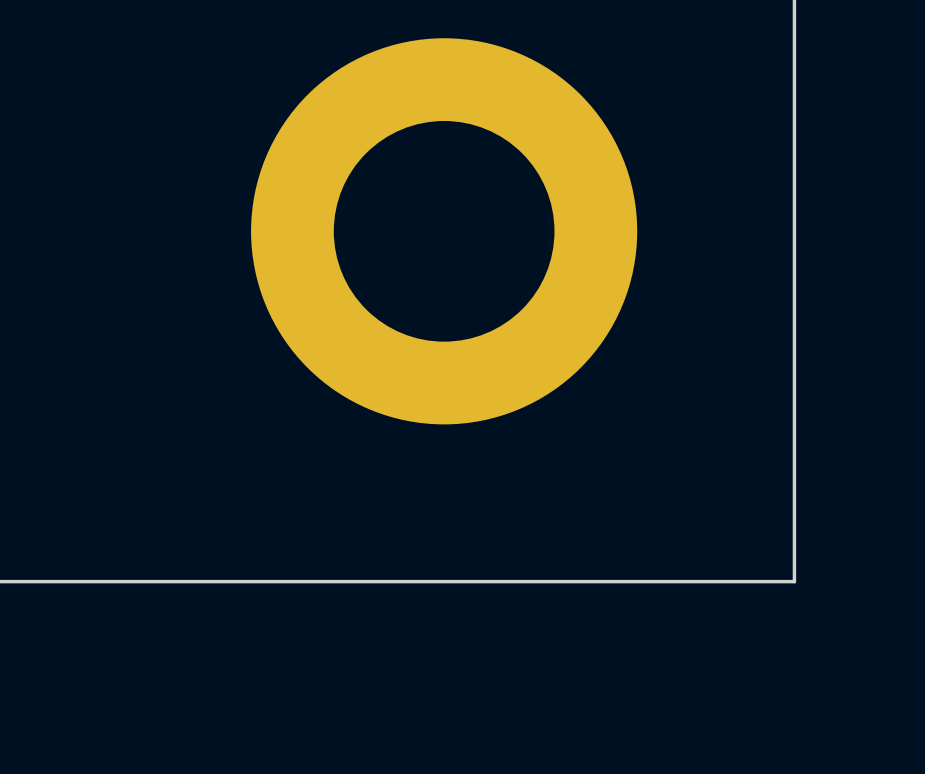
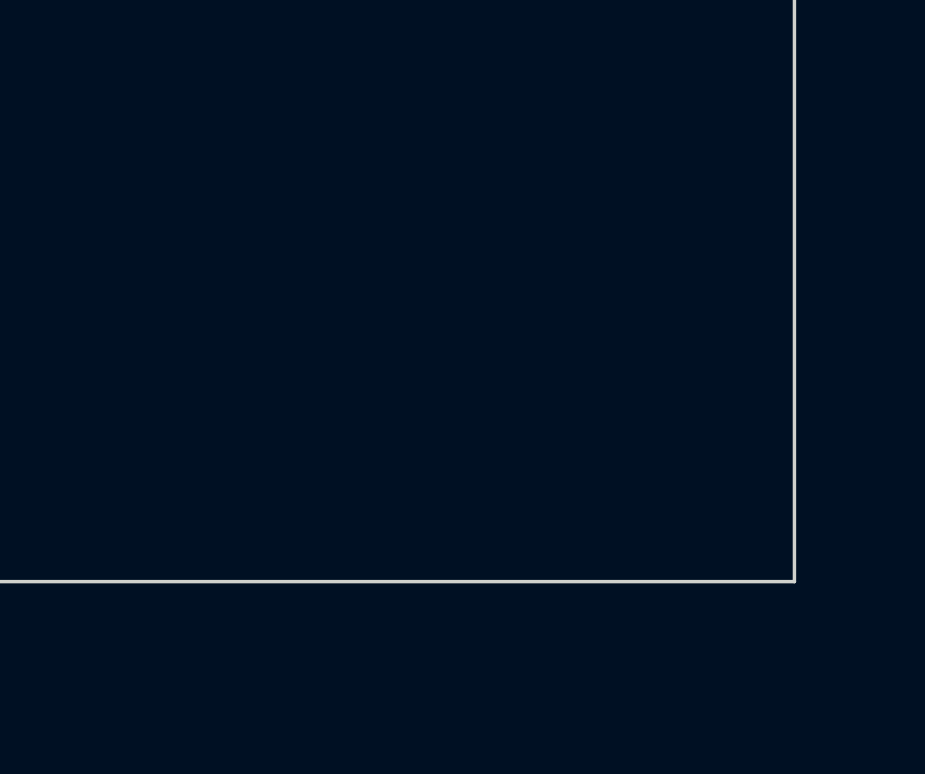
part: (444, 231) -> none

